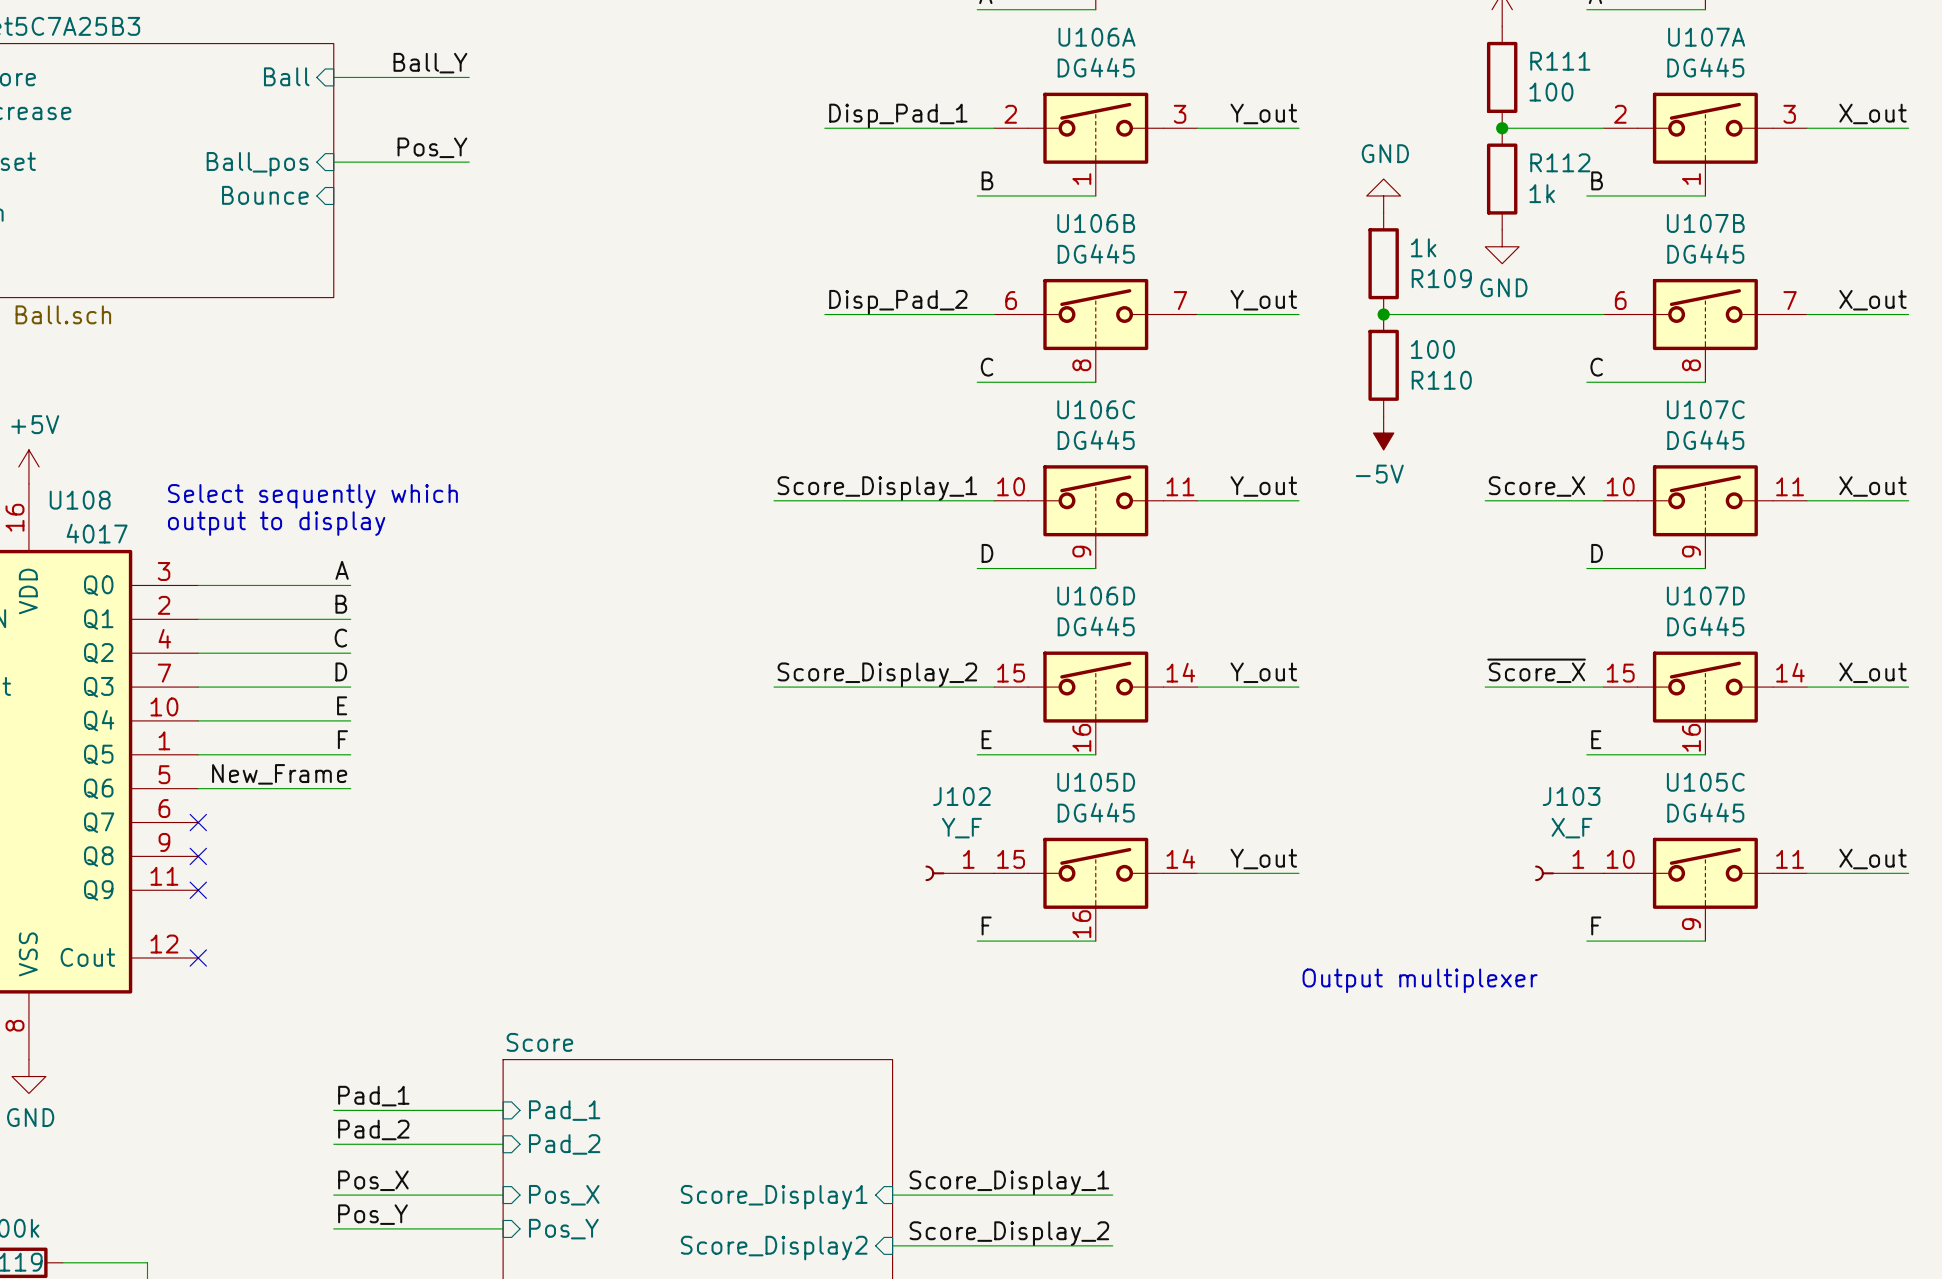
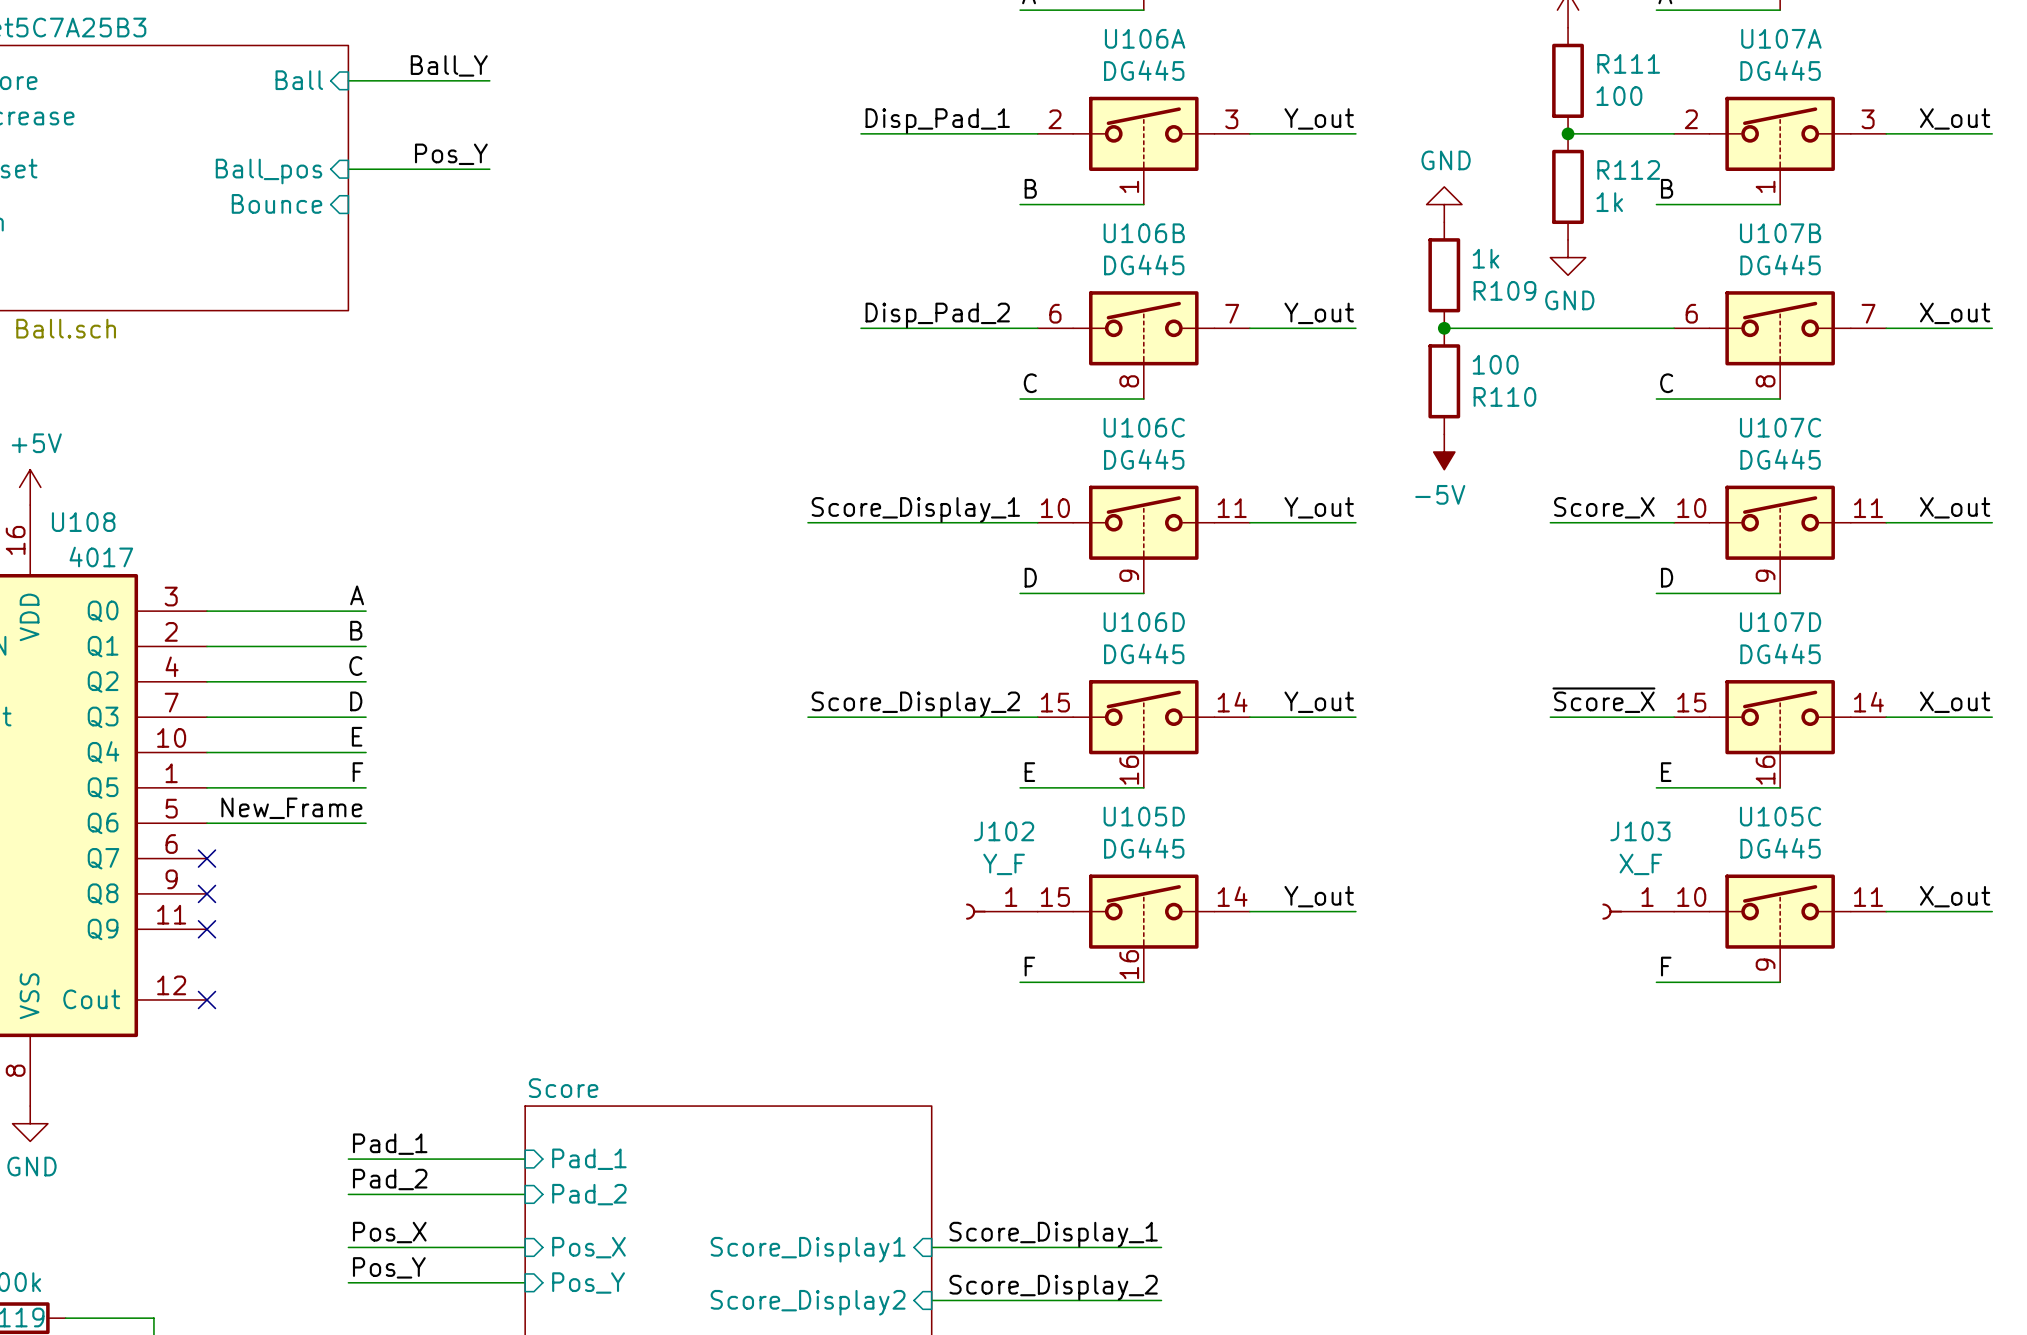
text: Select sequently which (312, 496) -> none
text: output to display (276, 523) -> none
text: Output multiplexer (1420, 980) -> none

